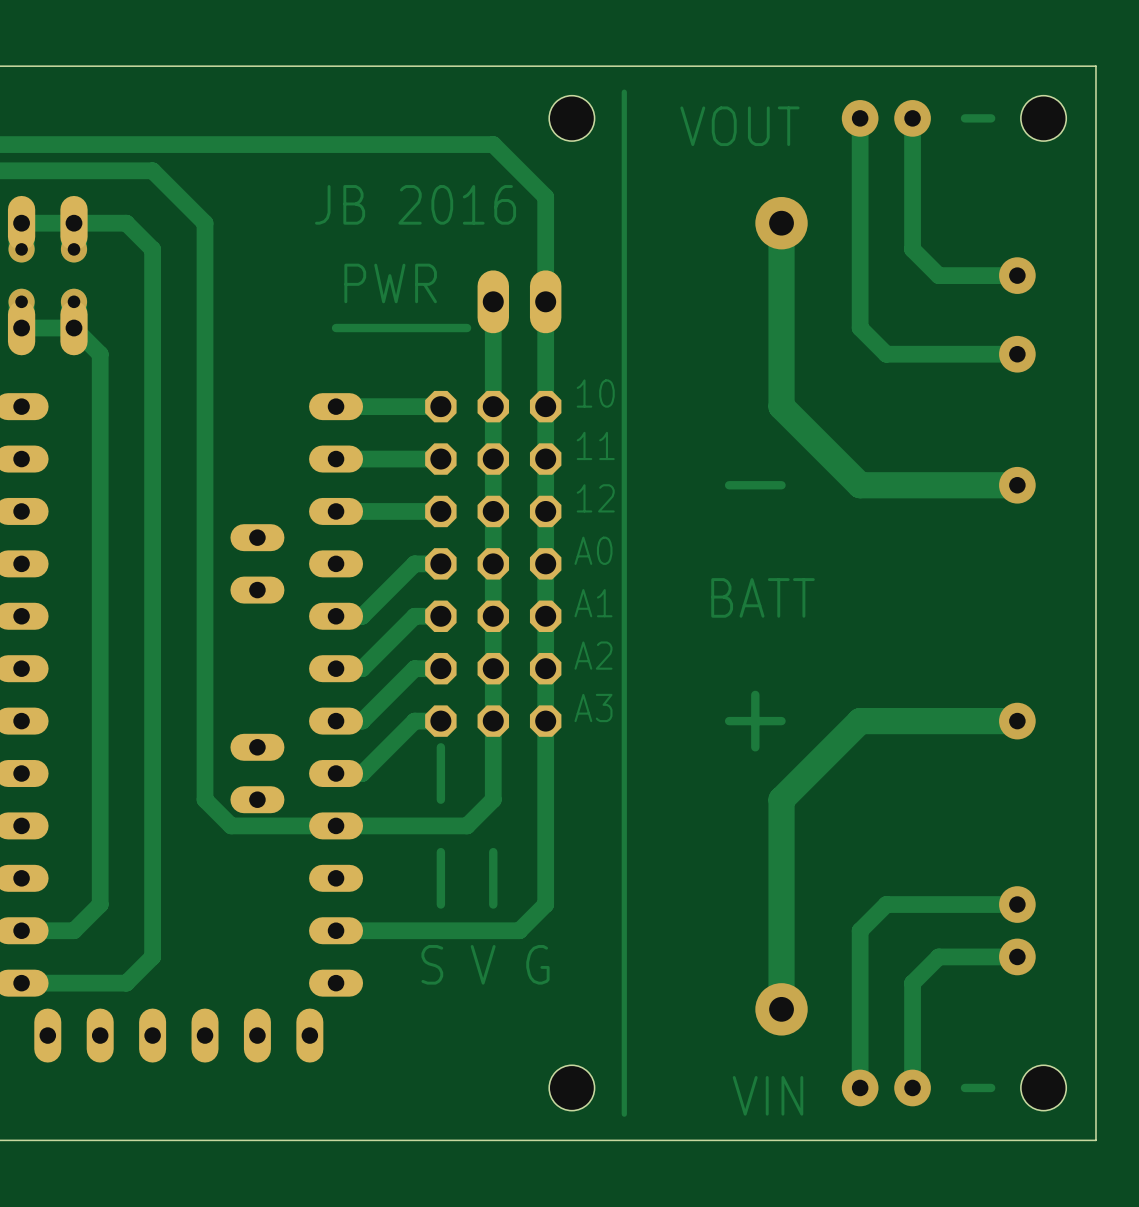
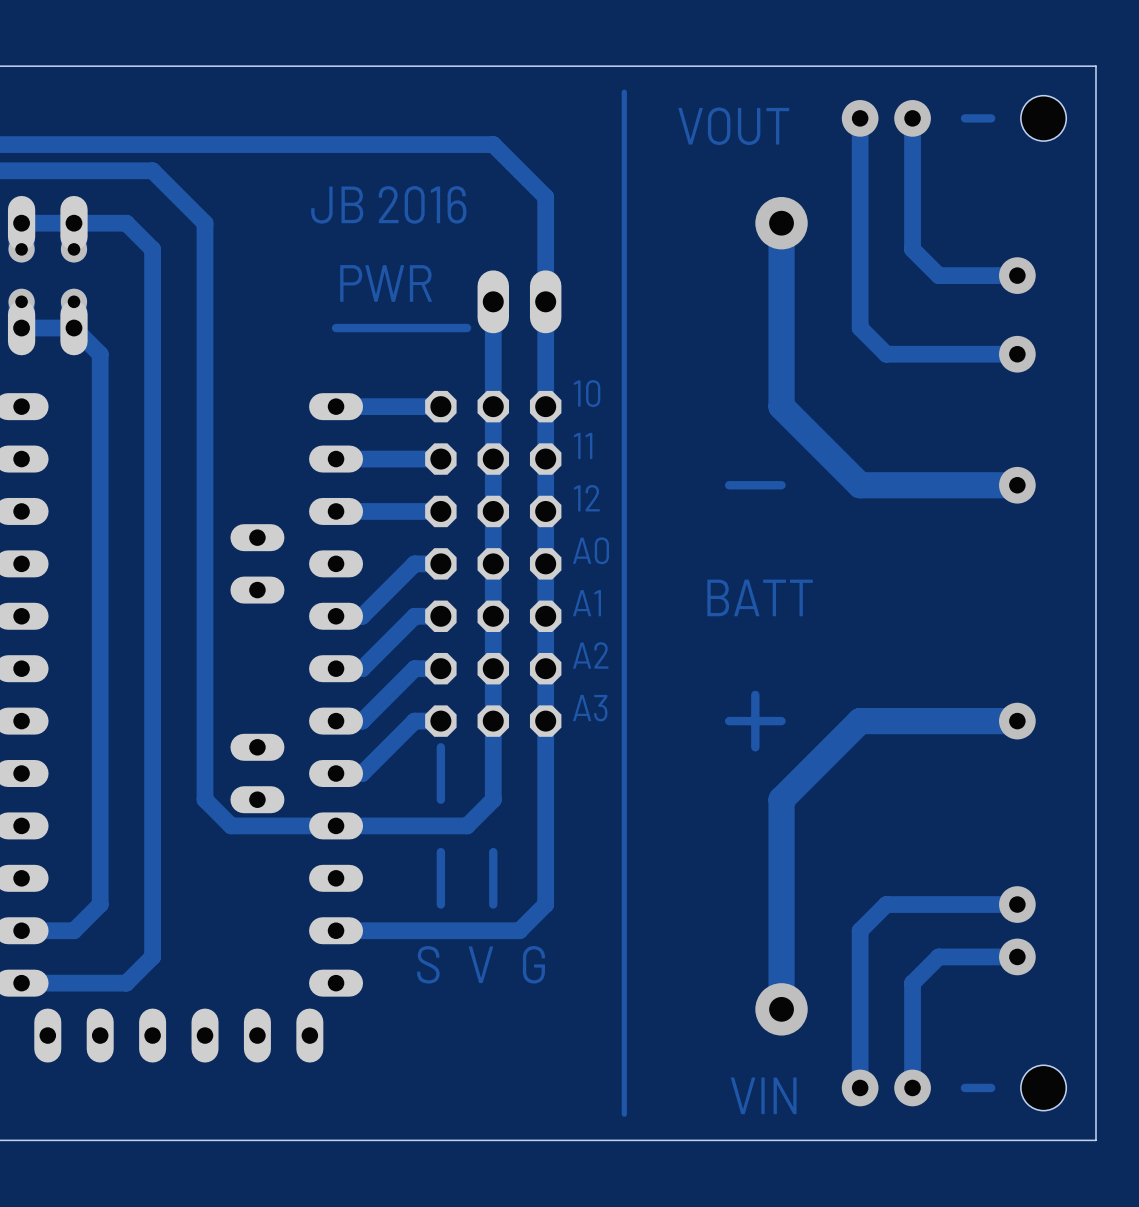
hole: (571, 118) -> none
hole: (571, 1087) -> none

